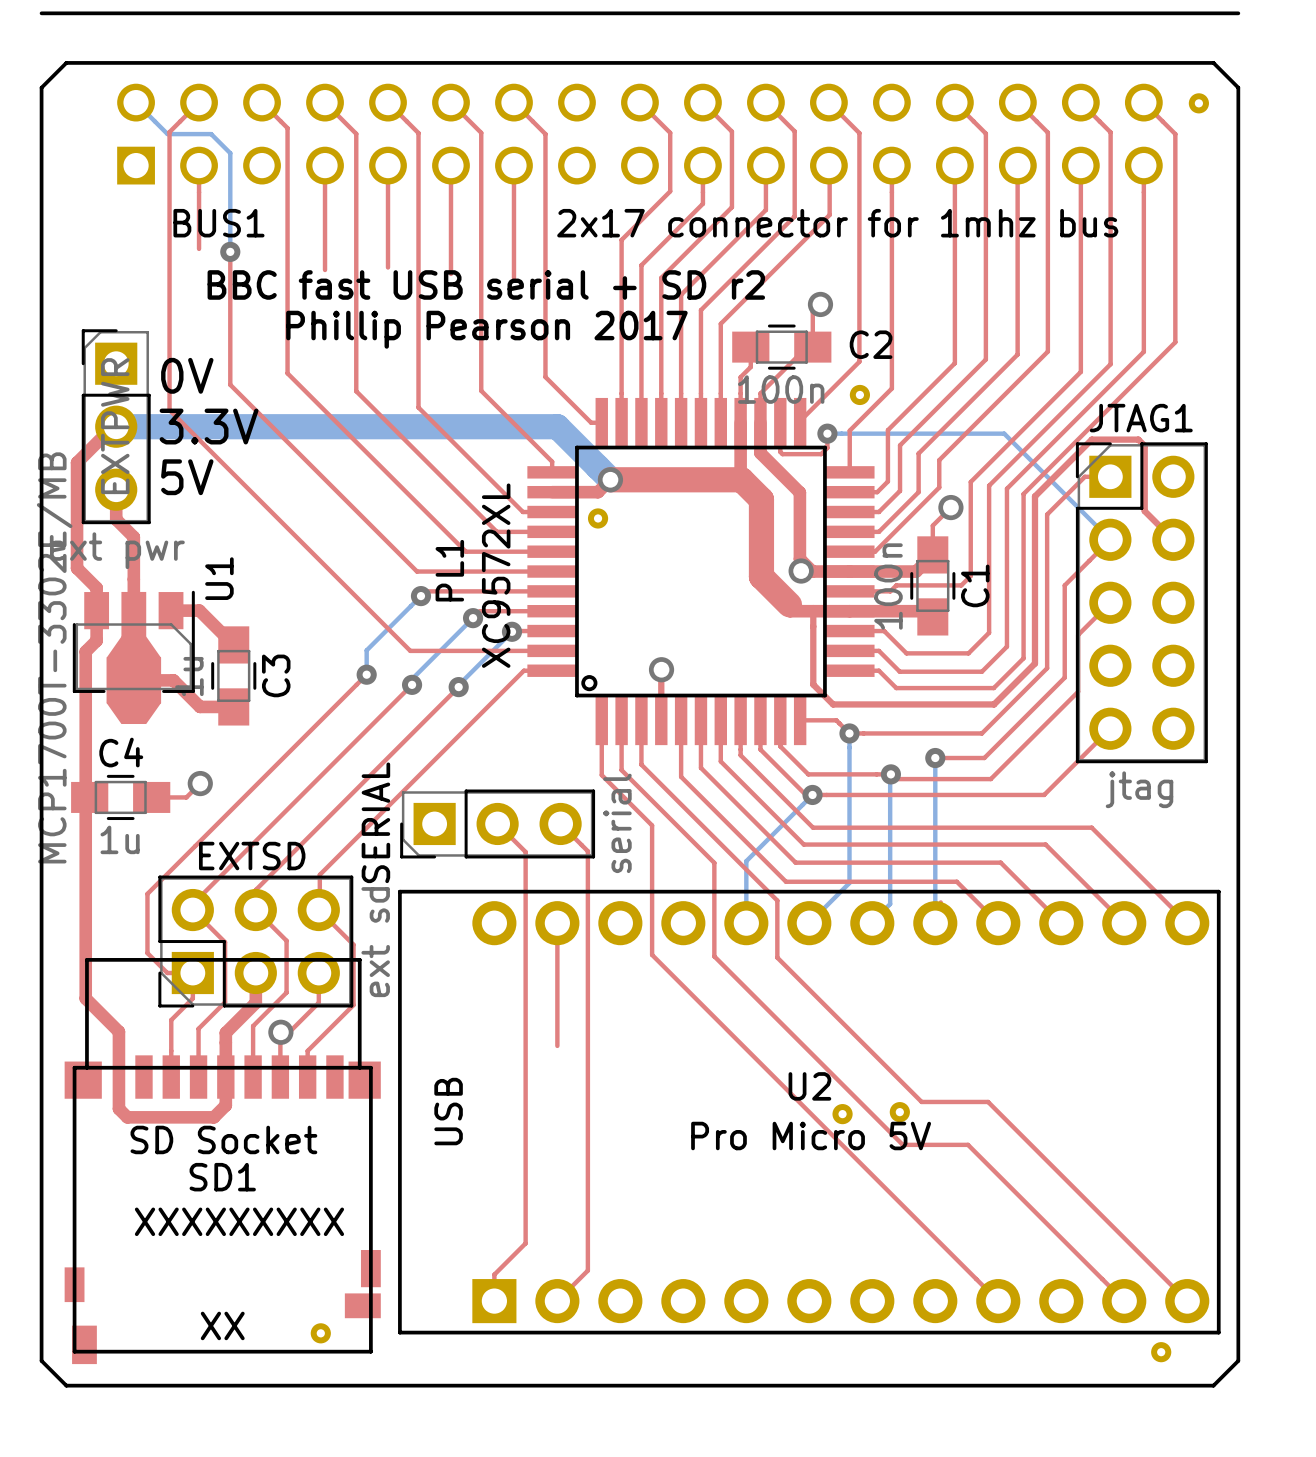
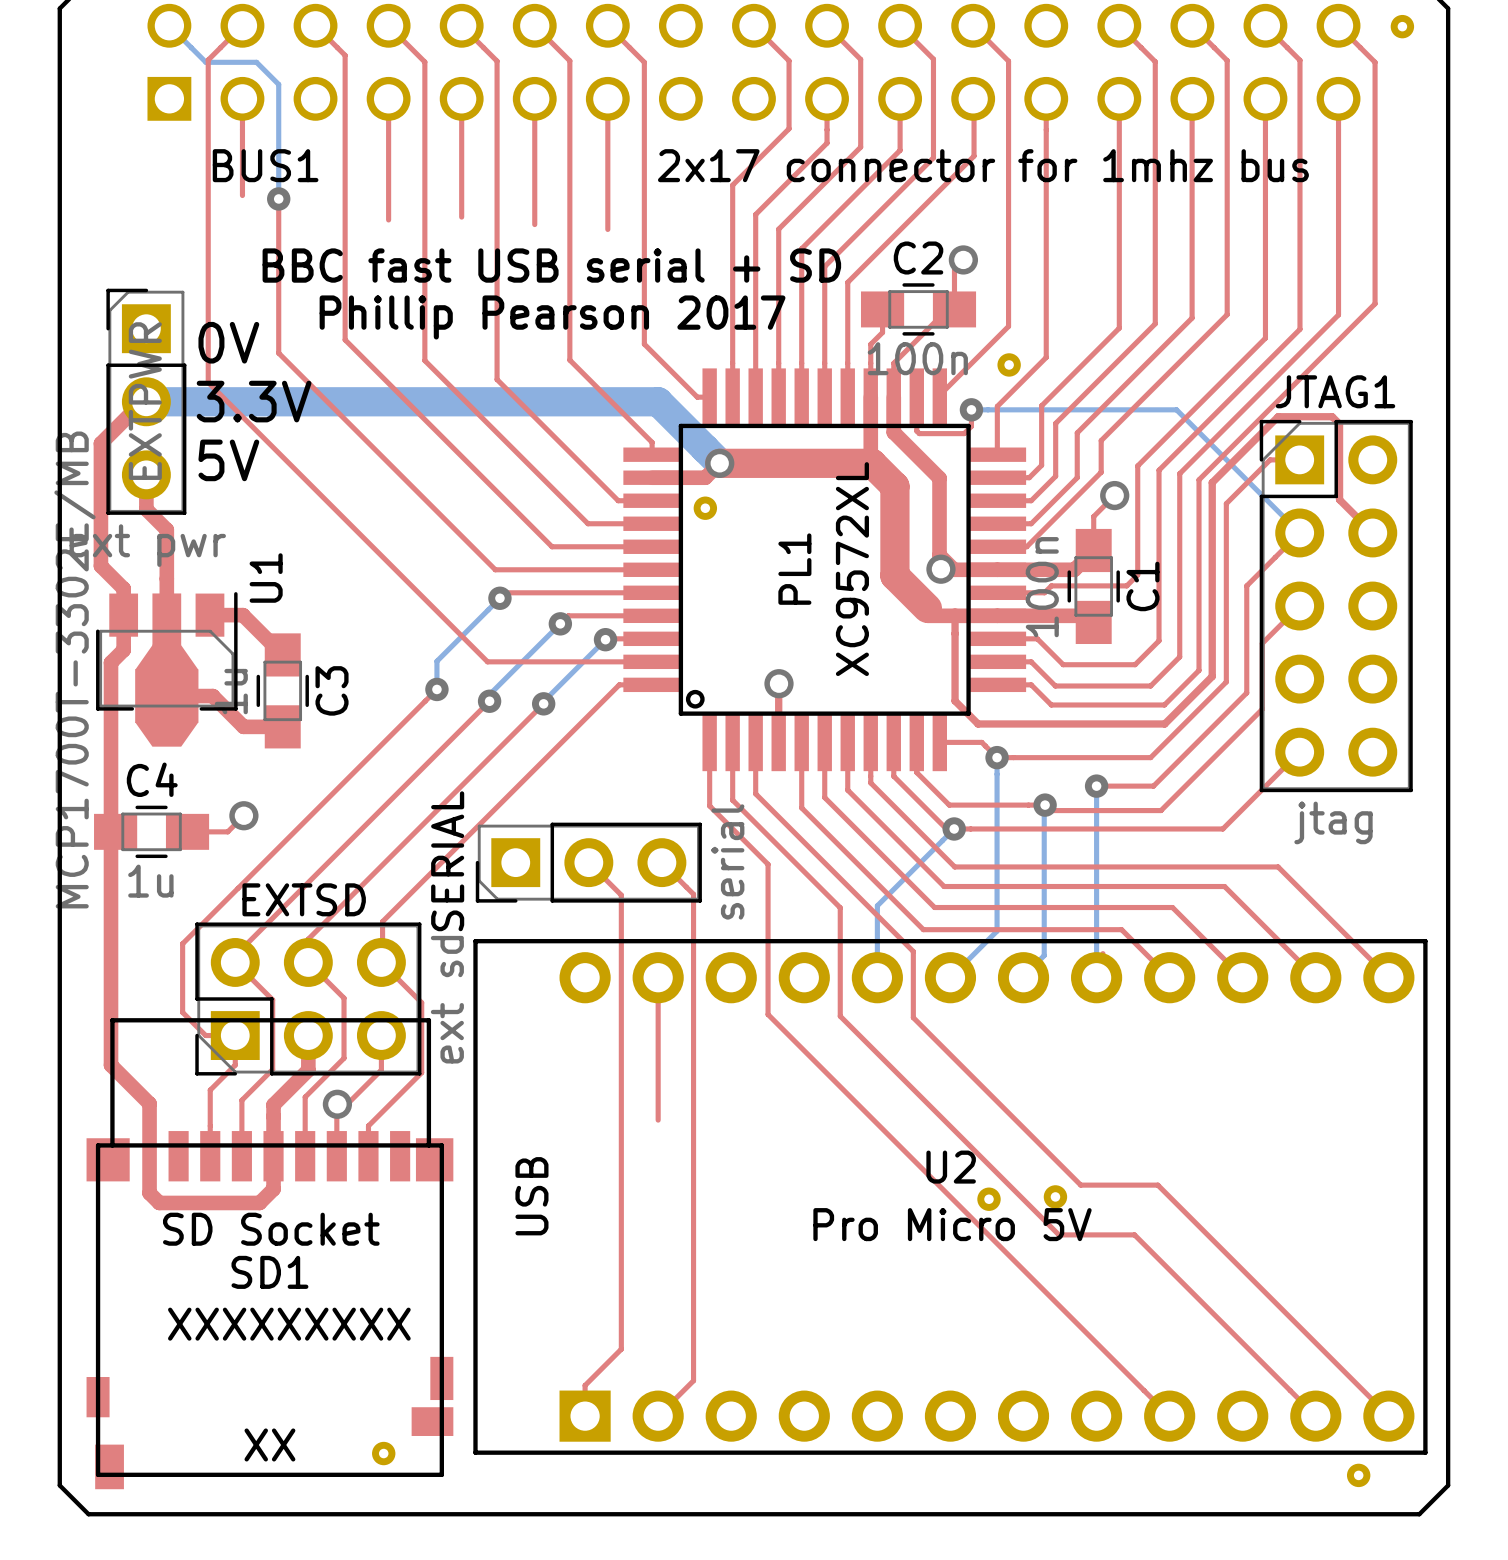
text: BBC fast USB serial + SD r2 (486, 284) -> BBC fast USB serial + SD (551, 265)
text position: Phillip Pearson 2017 (486, 329) -> Phillip Pearson 2017 (552, 317)
C2 name position: C2 (871, 344) -> C2 (918, 258)
PL1 name position: PL1 (449, 570) -> PL1 (794, 569)
PL1 value position: XC9572XL (496, 575) -> XC9572XL (852, 569)

